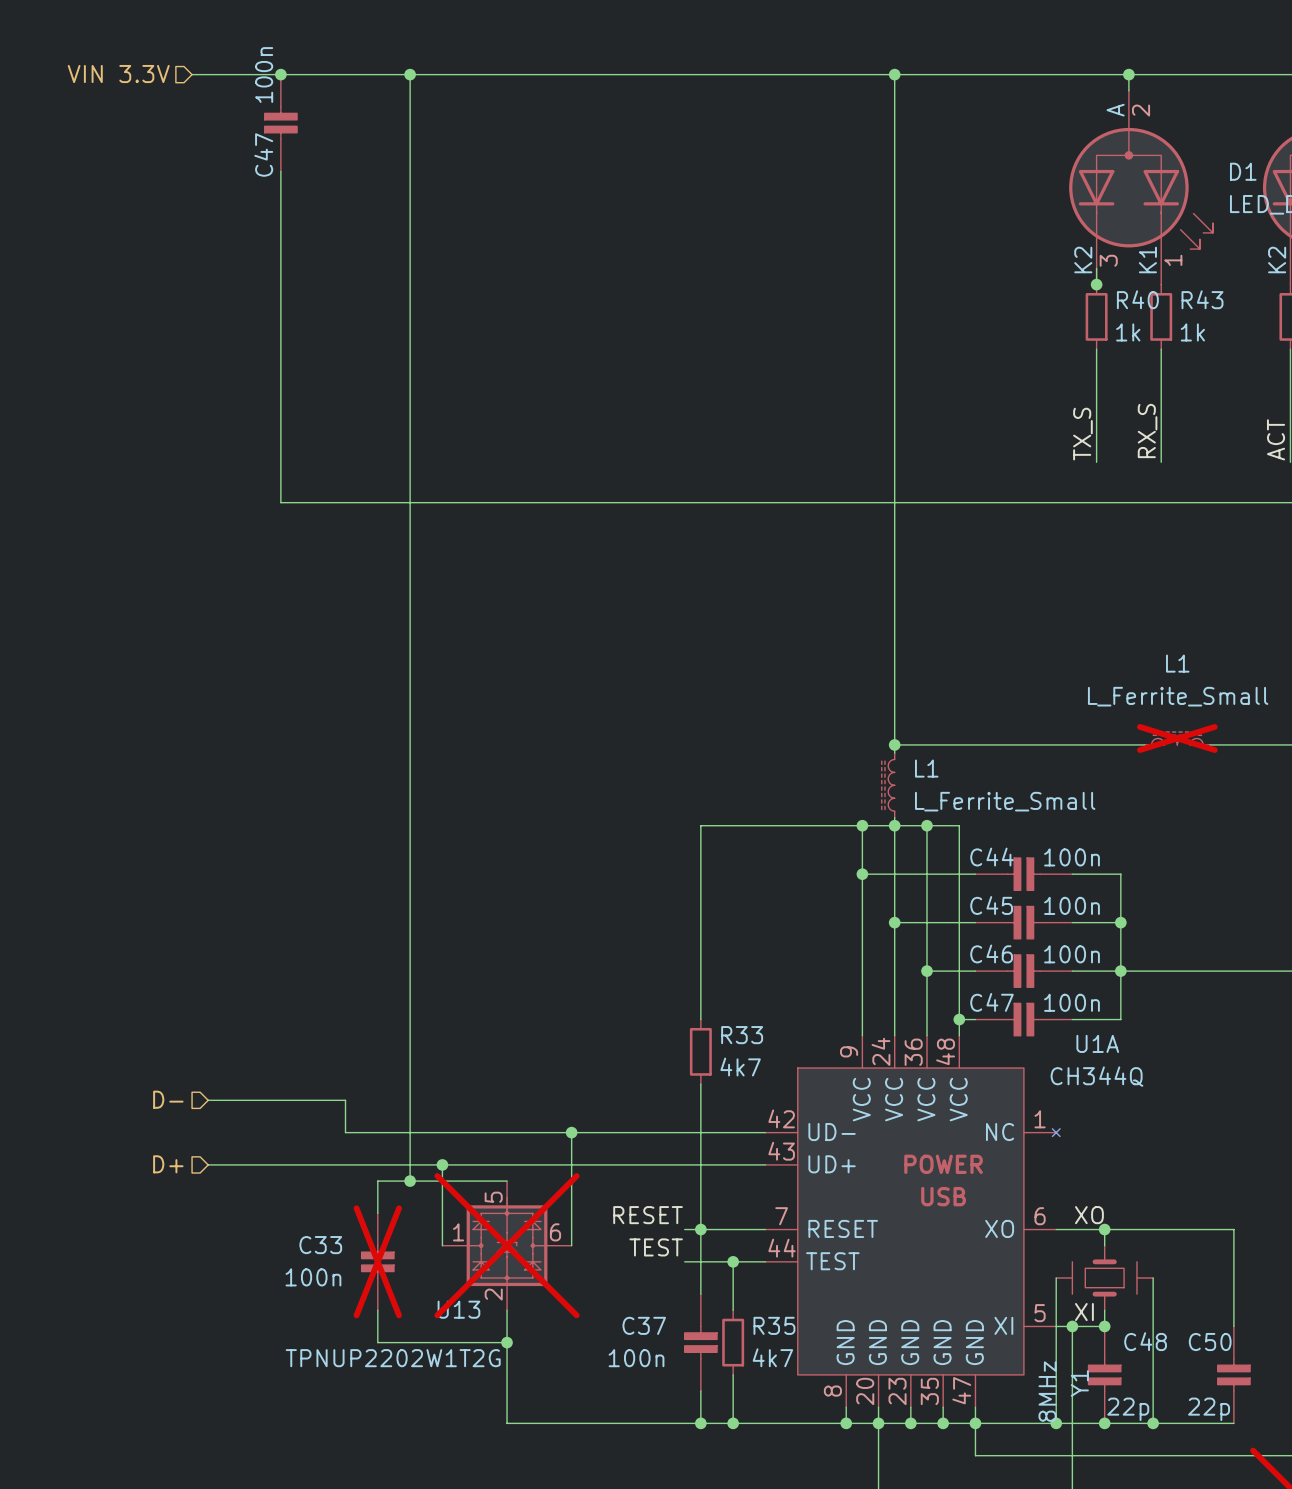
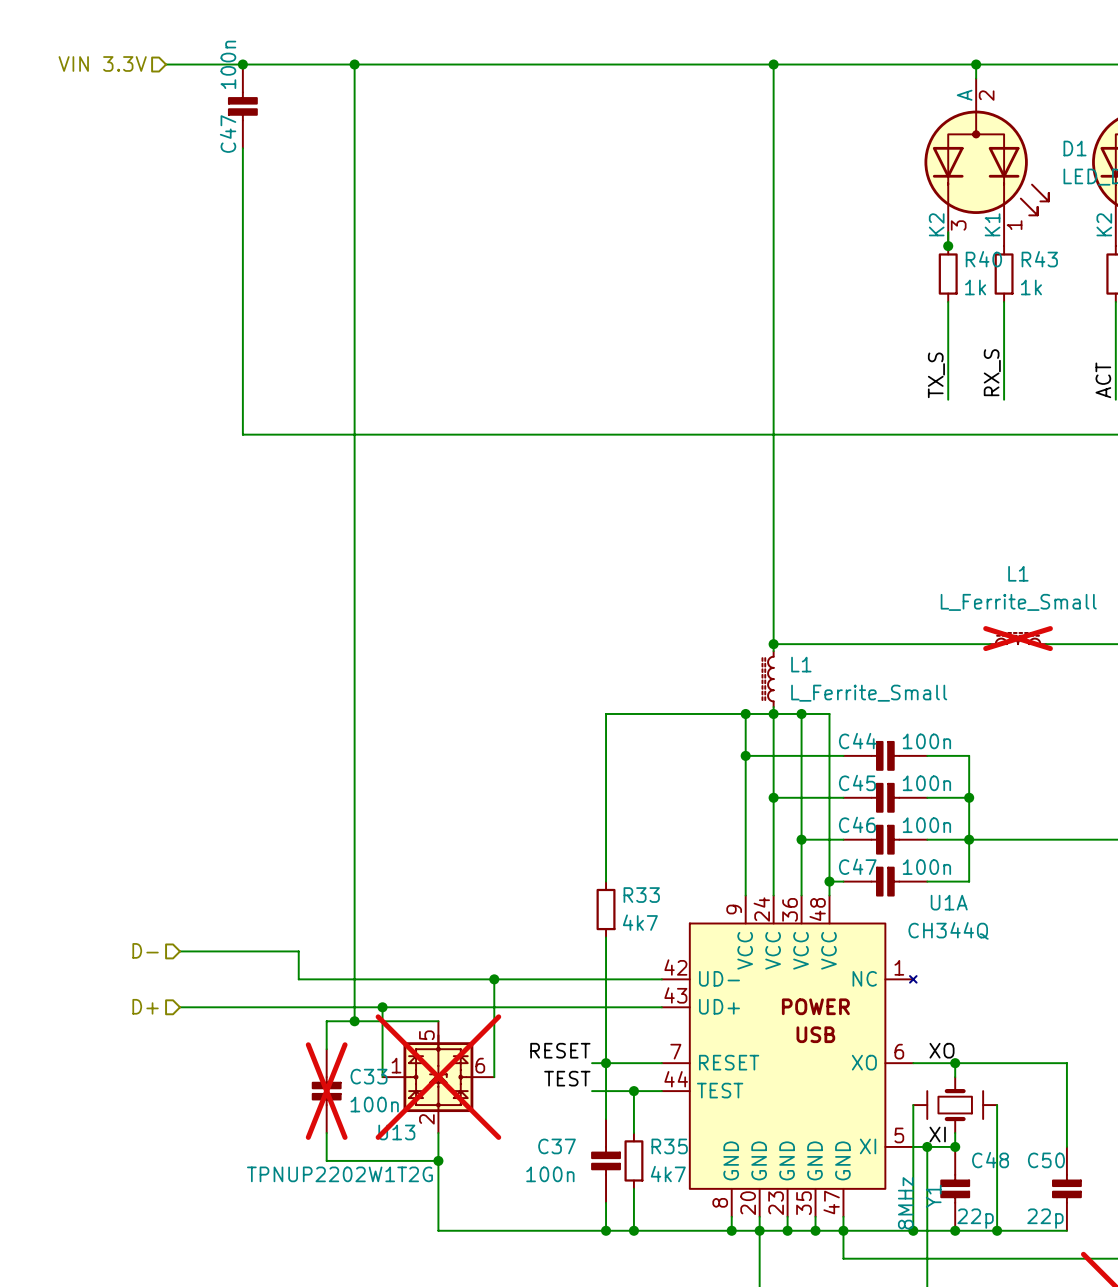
C33 name position: C33 (320, 1245) -> C33 (369, 1076)
C33 value position: 100n (313, 1277) -> 100n (374, 1104)

